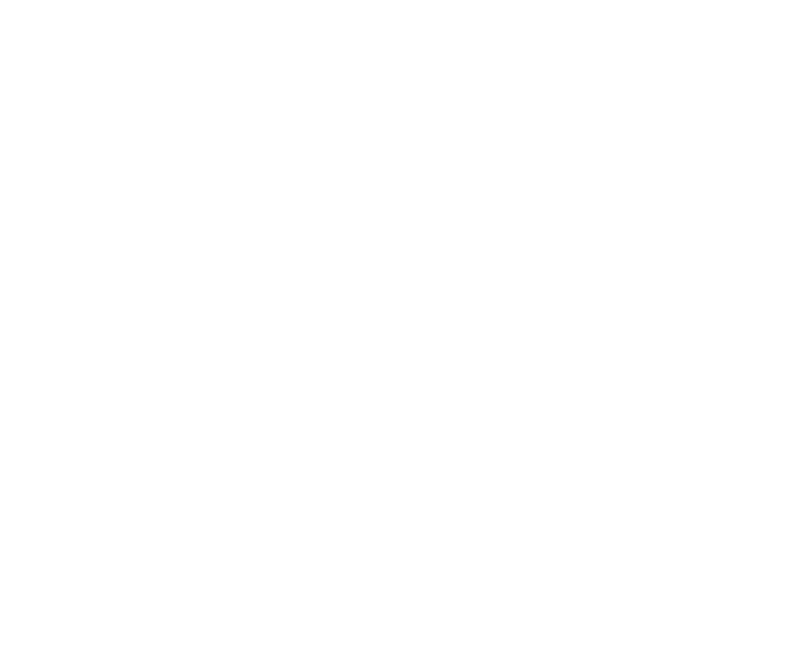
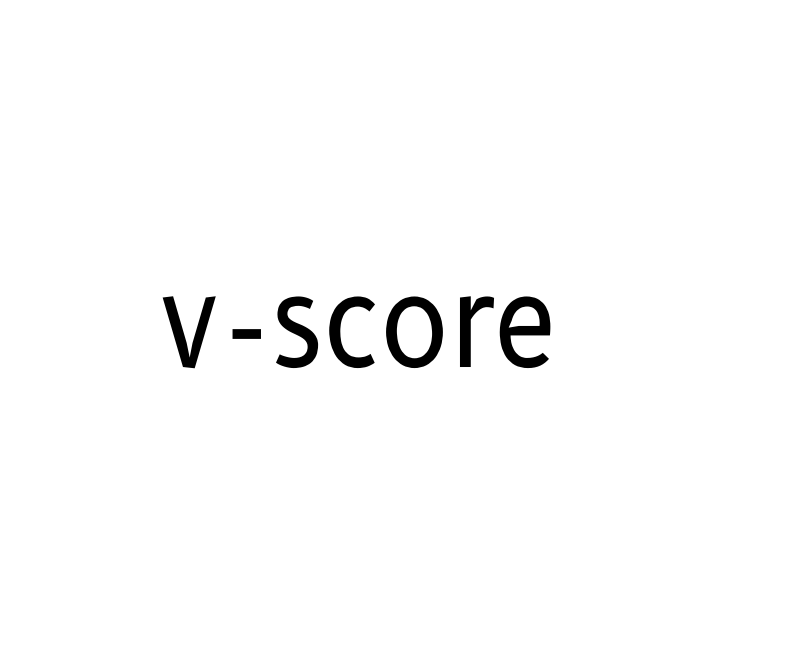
text: none -> v-score (356, 332)

